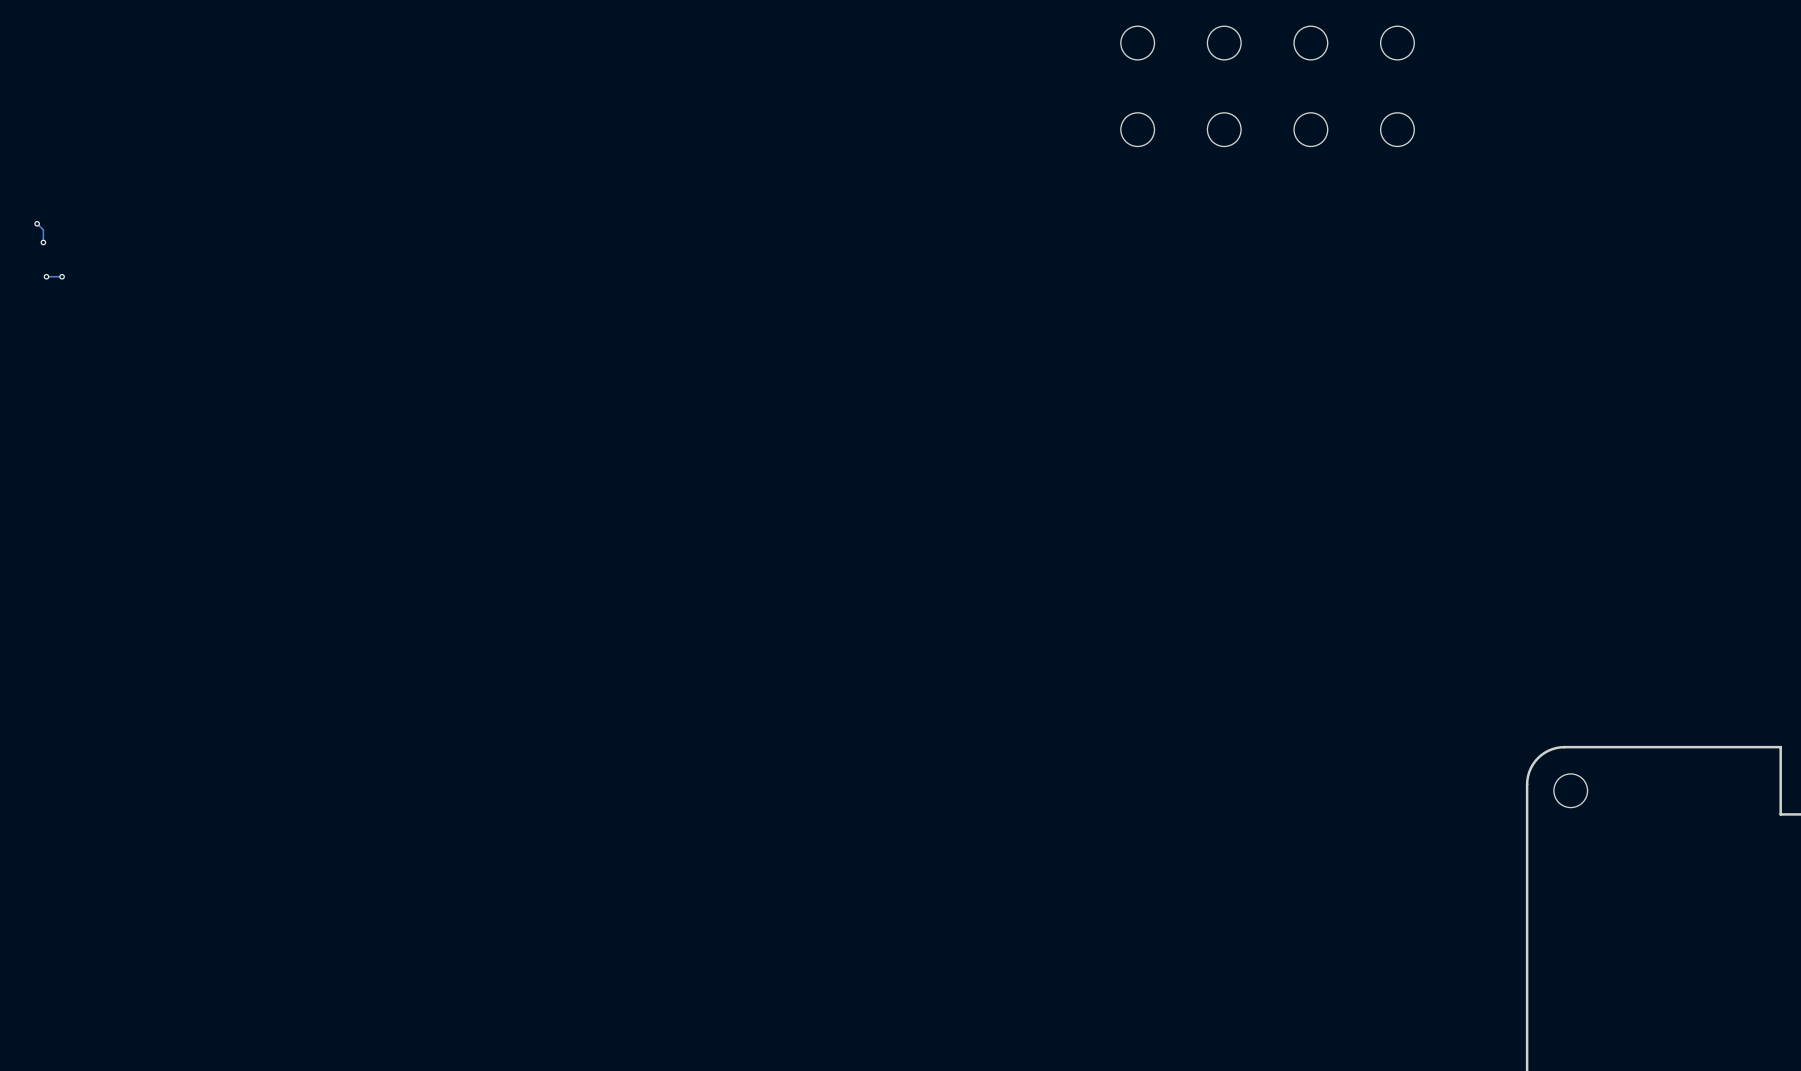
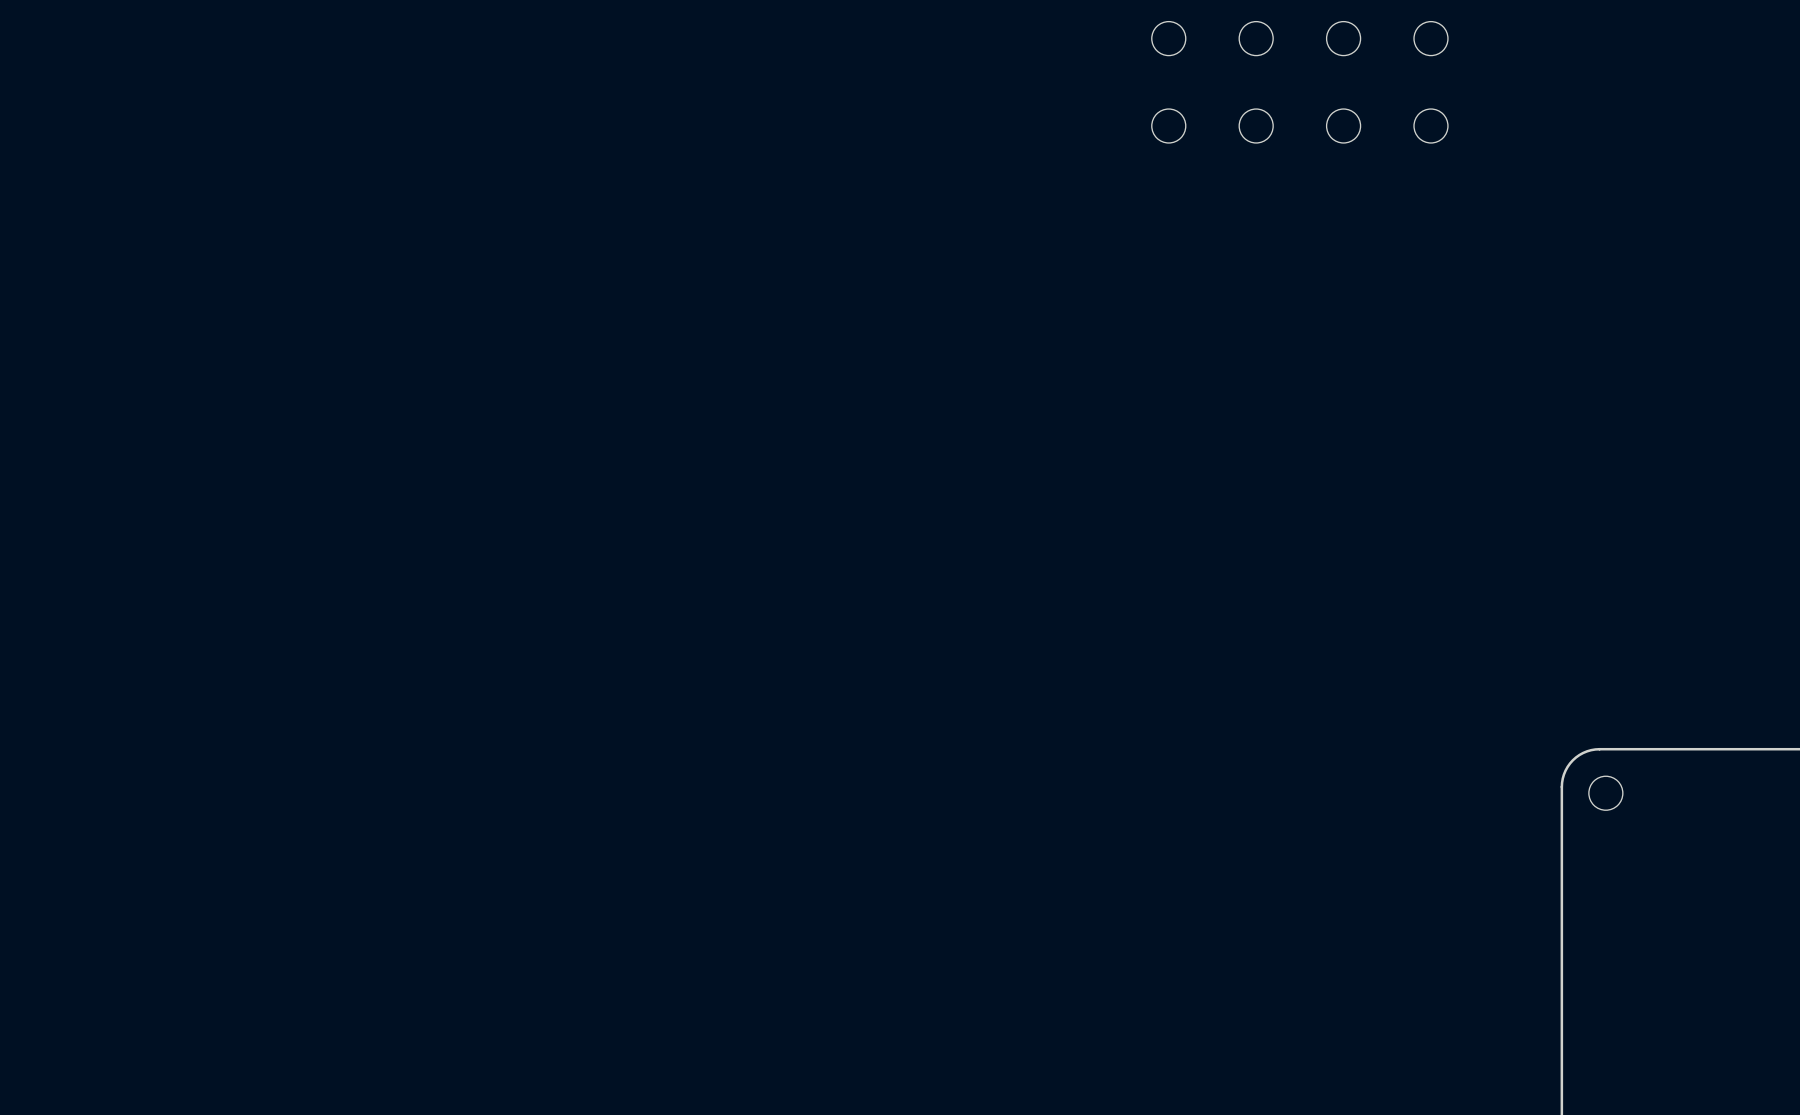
track: (37, 223) (43, 230) (43, 242) -> none
via: (37, 223) -> none
via: (43, 242) -> none
via: (46, 276) -> none
track: (62, 276) (46, 276) -> none
via: (62, 276) -> none

